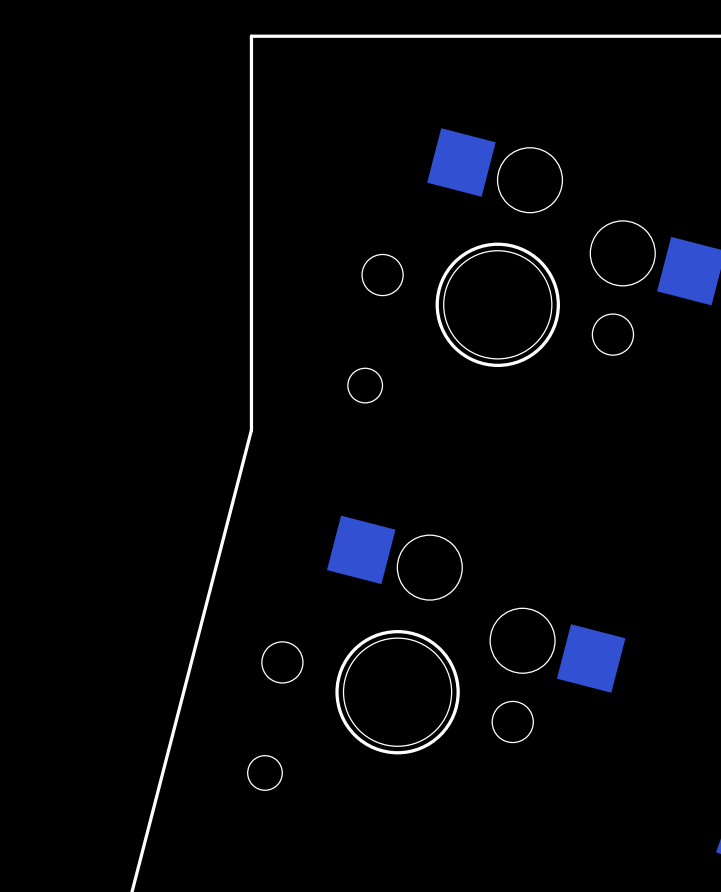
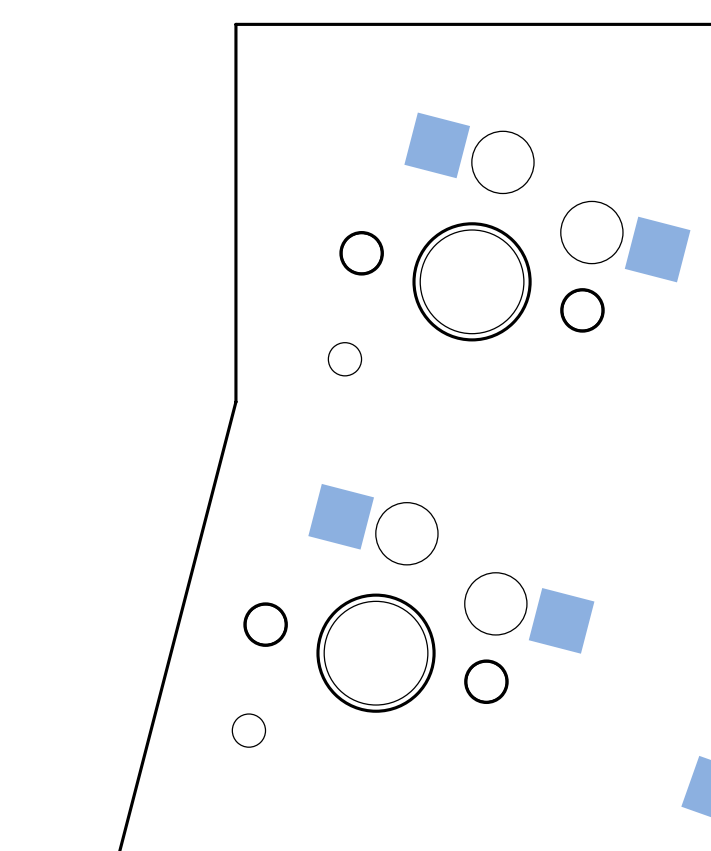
round board edge: none -> [339, 231, 384, 276]
round board edge: none -> [560, 288, 605, 333]
round board edge: none -> [243, 602, 288, 647]
round board edge: none -> [464, 659, 509, 705]

